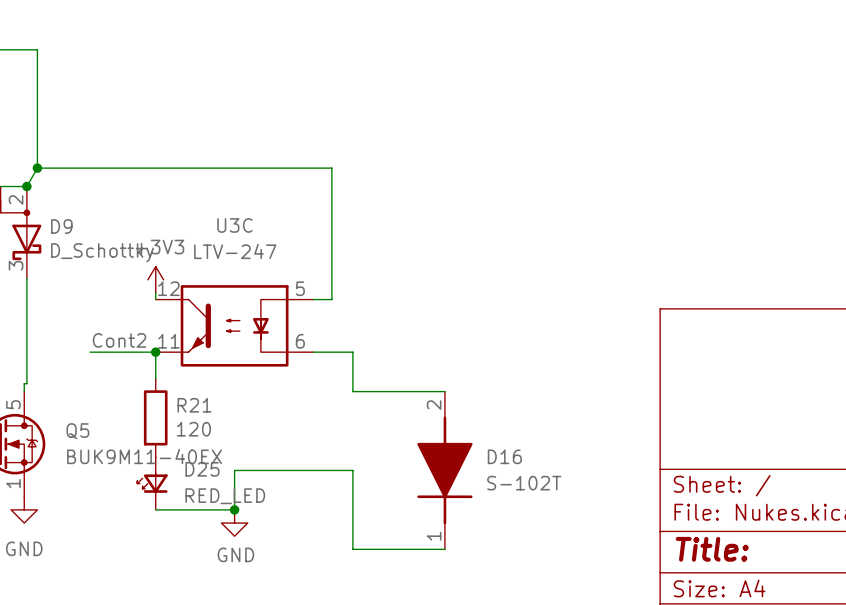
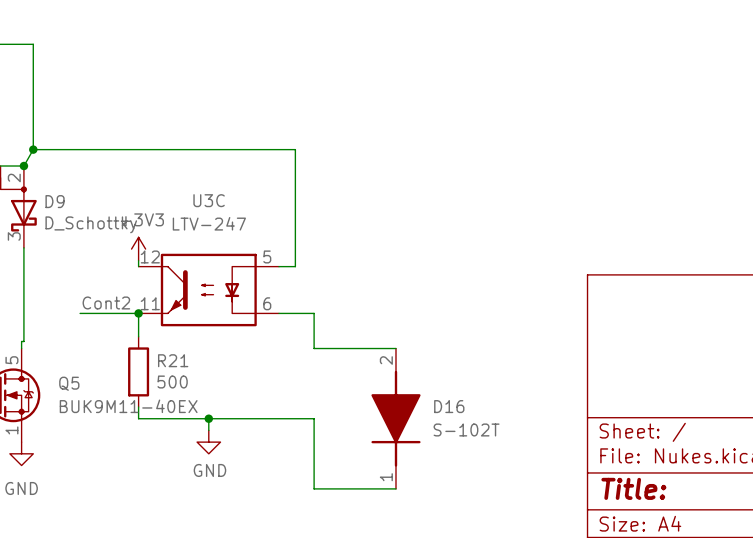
R21 value: 120 (193, 429) -> 500 (172, 382)
wire: none -> (138, 407) (138, 418) (208, 418)
D25: RED_LED (152, 483) -> none
wire: (234, 483) (234, 509) (155, 509) -> none
junction position: (234, 509) -> (208, 418)
power symbol position: GND (234, 523) -> GND (208, 442)

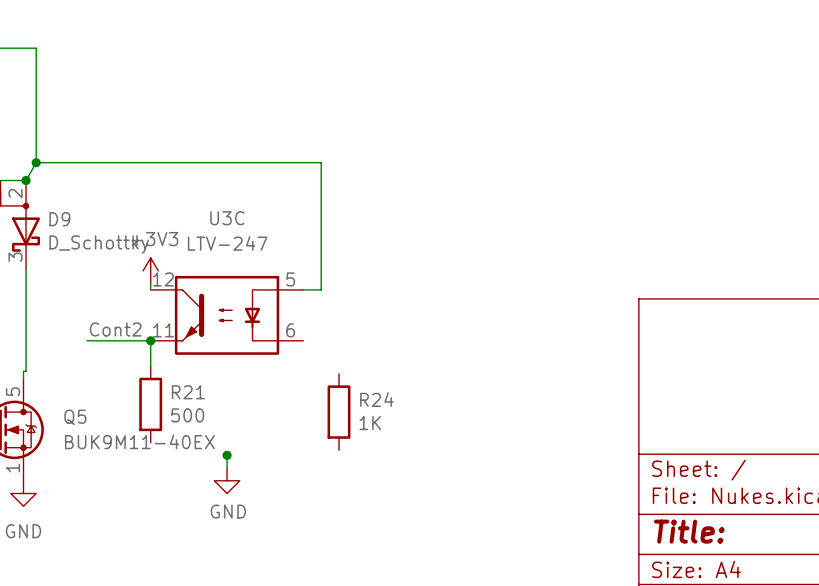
wire: (278, 313) (314, 313) (314, 348) (395, 348) -> none
R24: none -> 1K (339, 412)
wire: (138, 407) (138, 418) (314, 418) (314, 488) (395, 488) -> none
D16: S-102T (395, 418) -> none

